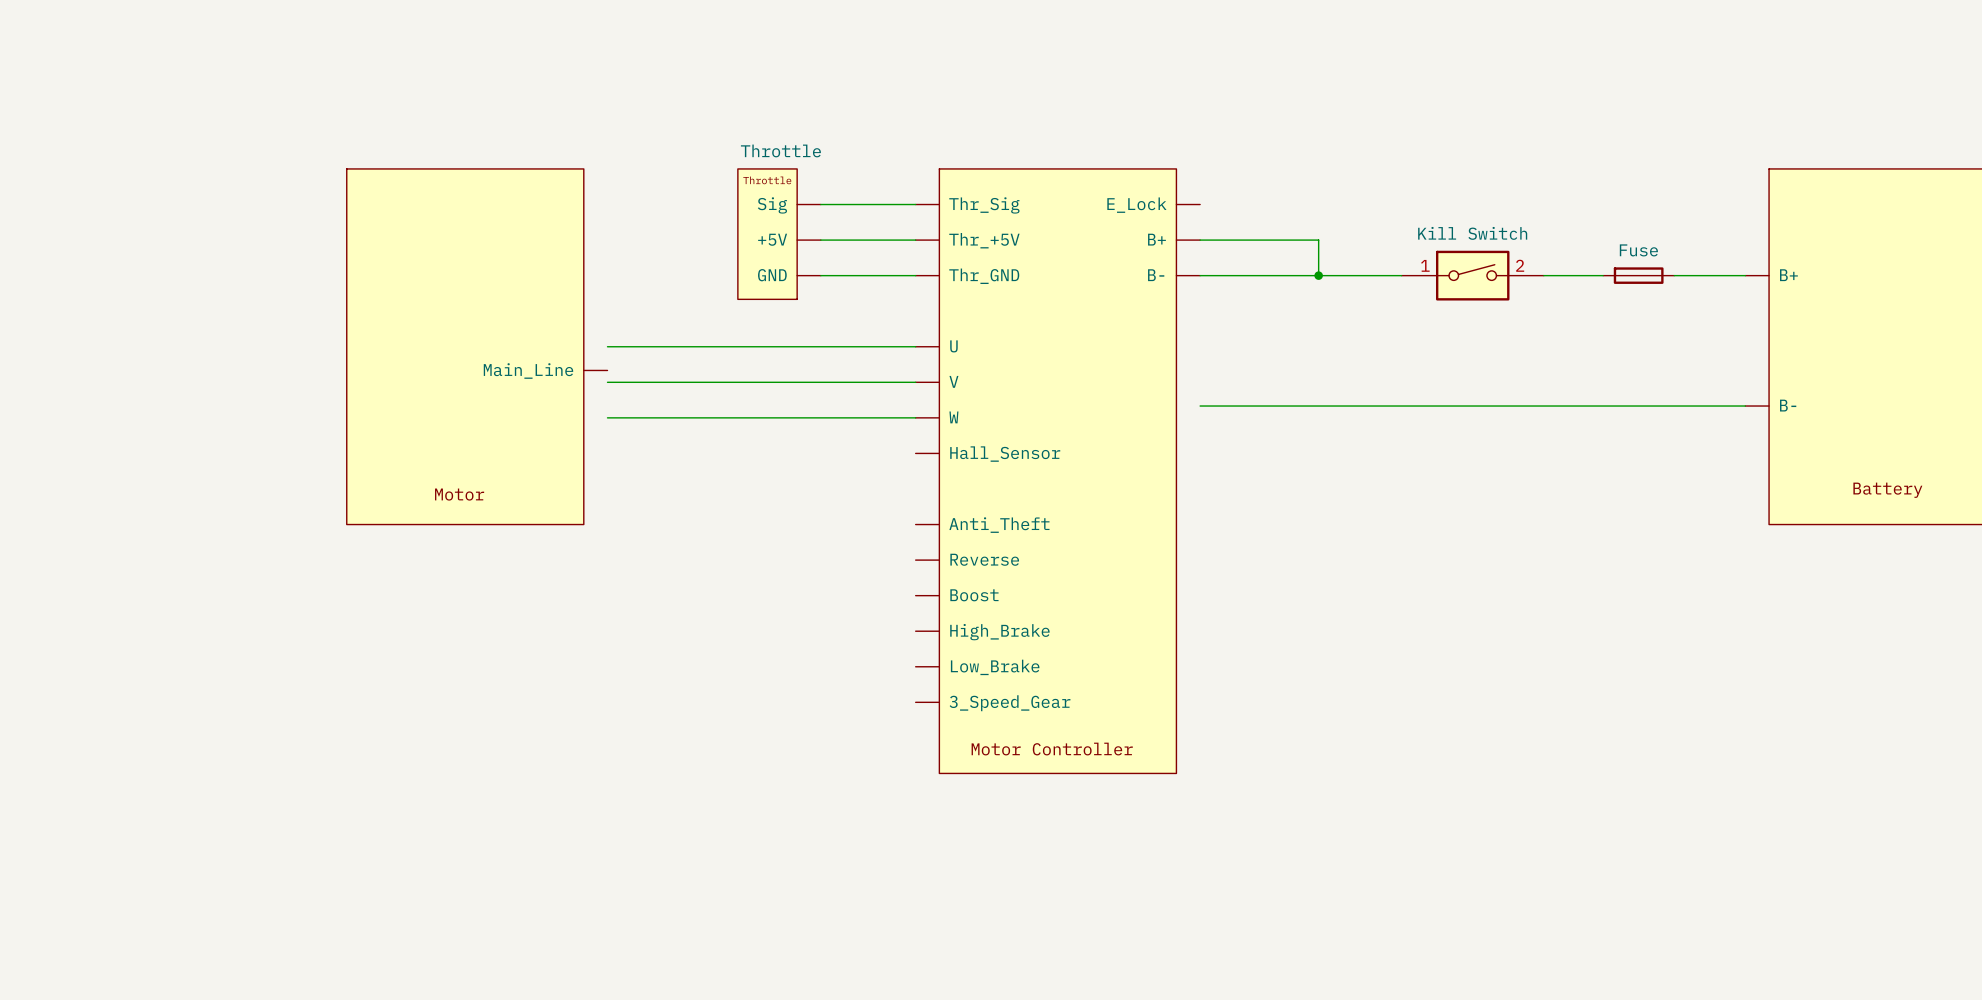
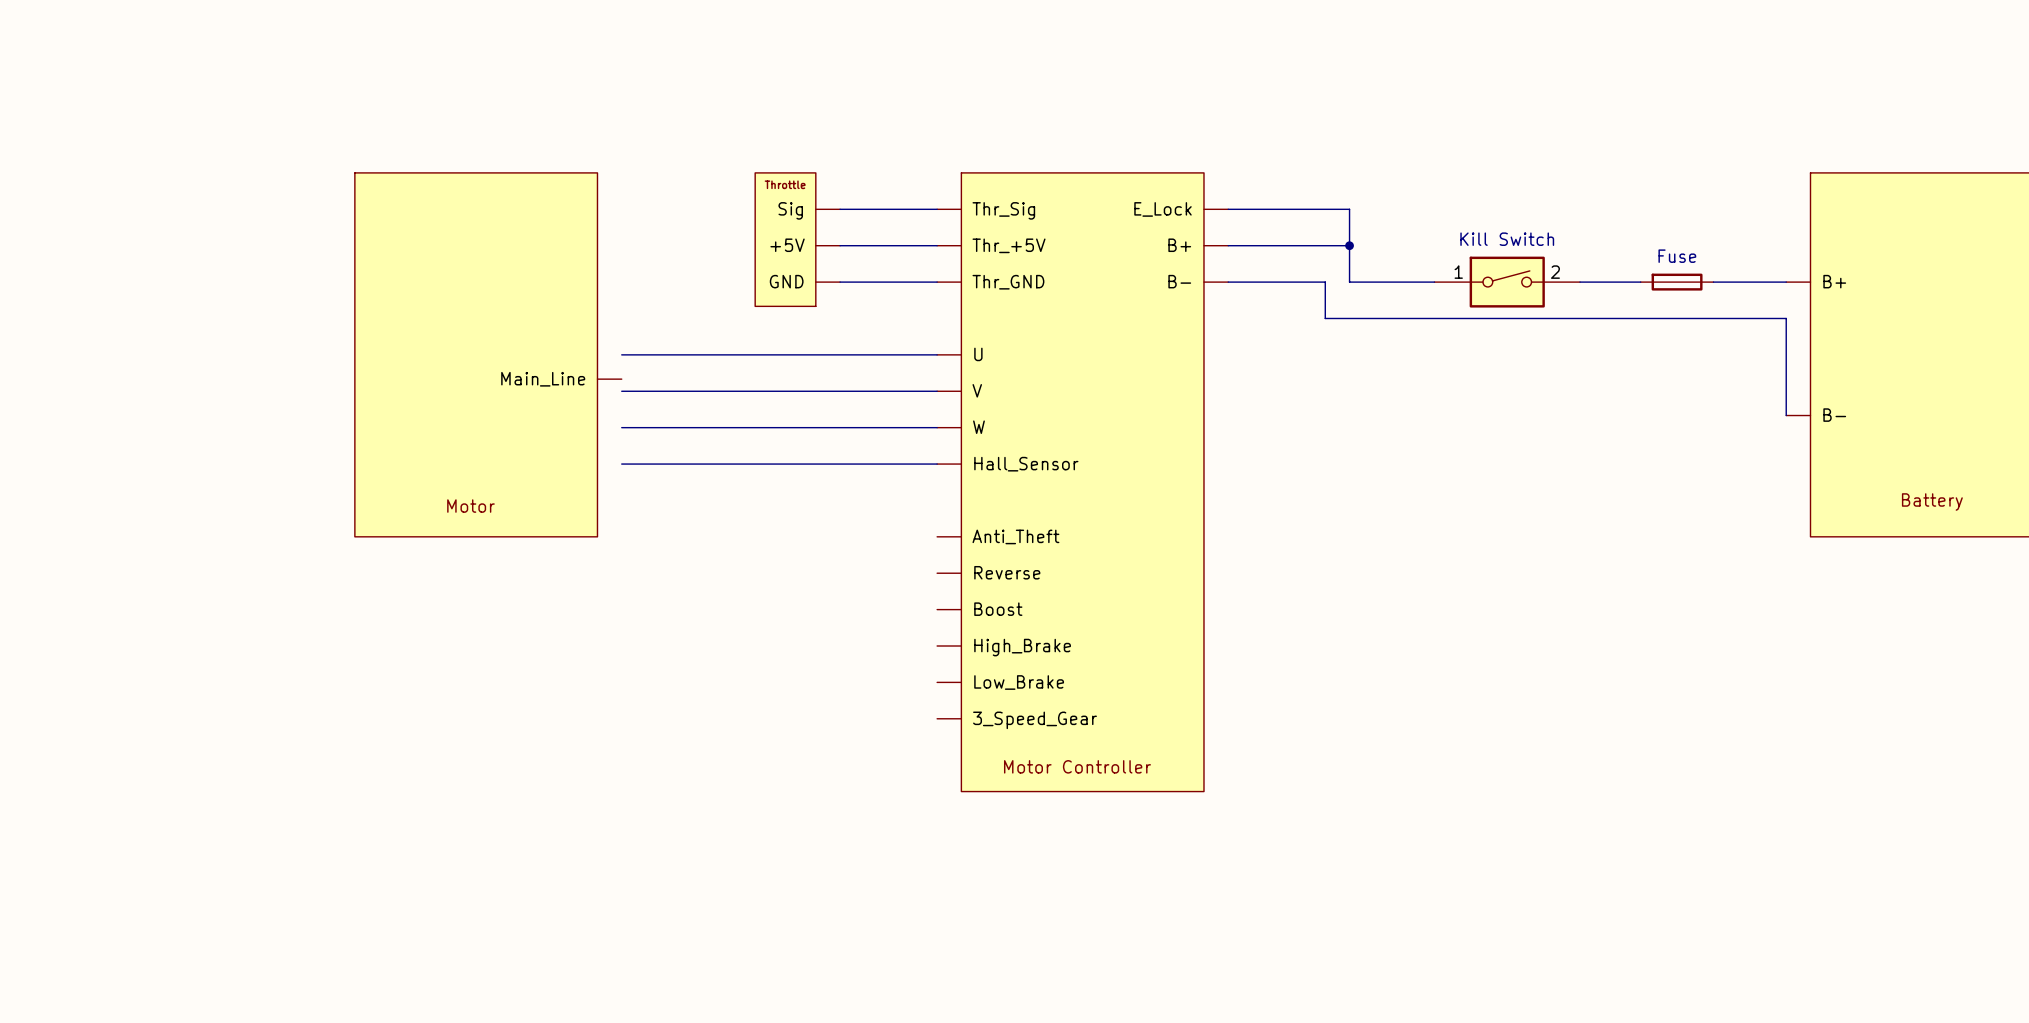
part value: Throttle (780, 150) -> none
wire: none -> (1228, 209) (1349, 209) (1349, 245)
wire: (1294, 275) (1318, 275) -> none
junction position: (1318, 275) -> (1349, 245)
wire: (1200, 406) (1745, 406) -> (1325, 282) (1325, 318) (1786, 318) (1786, 415)
wire: none -> (621, 464) (937, 464)

